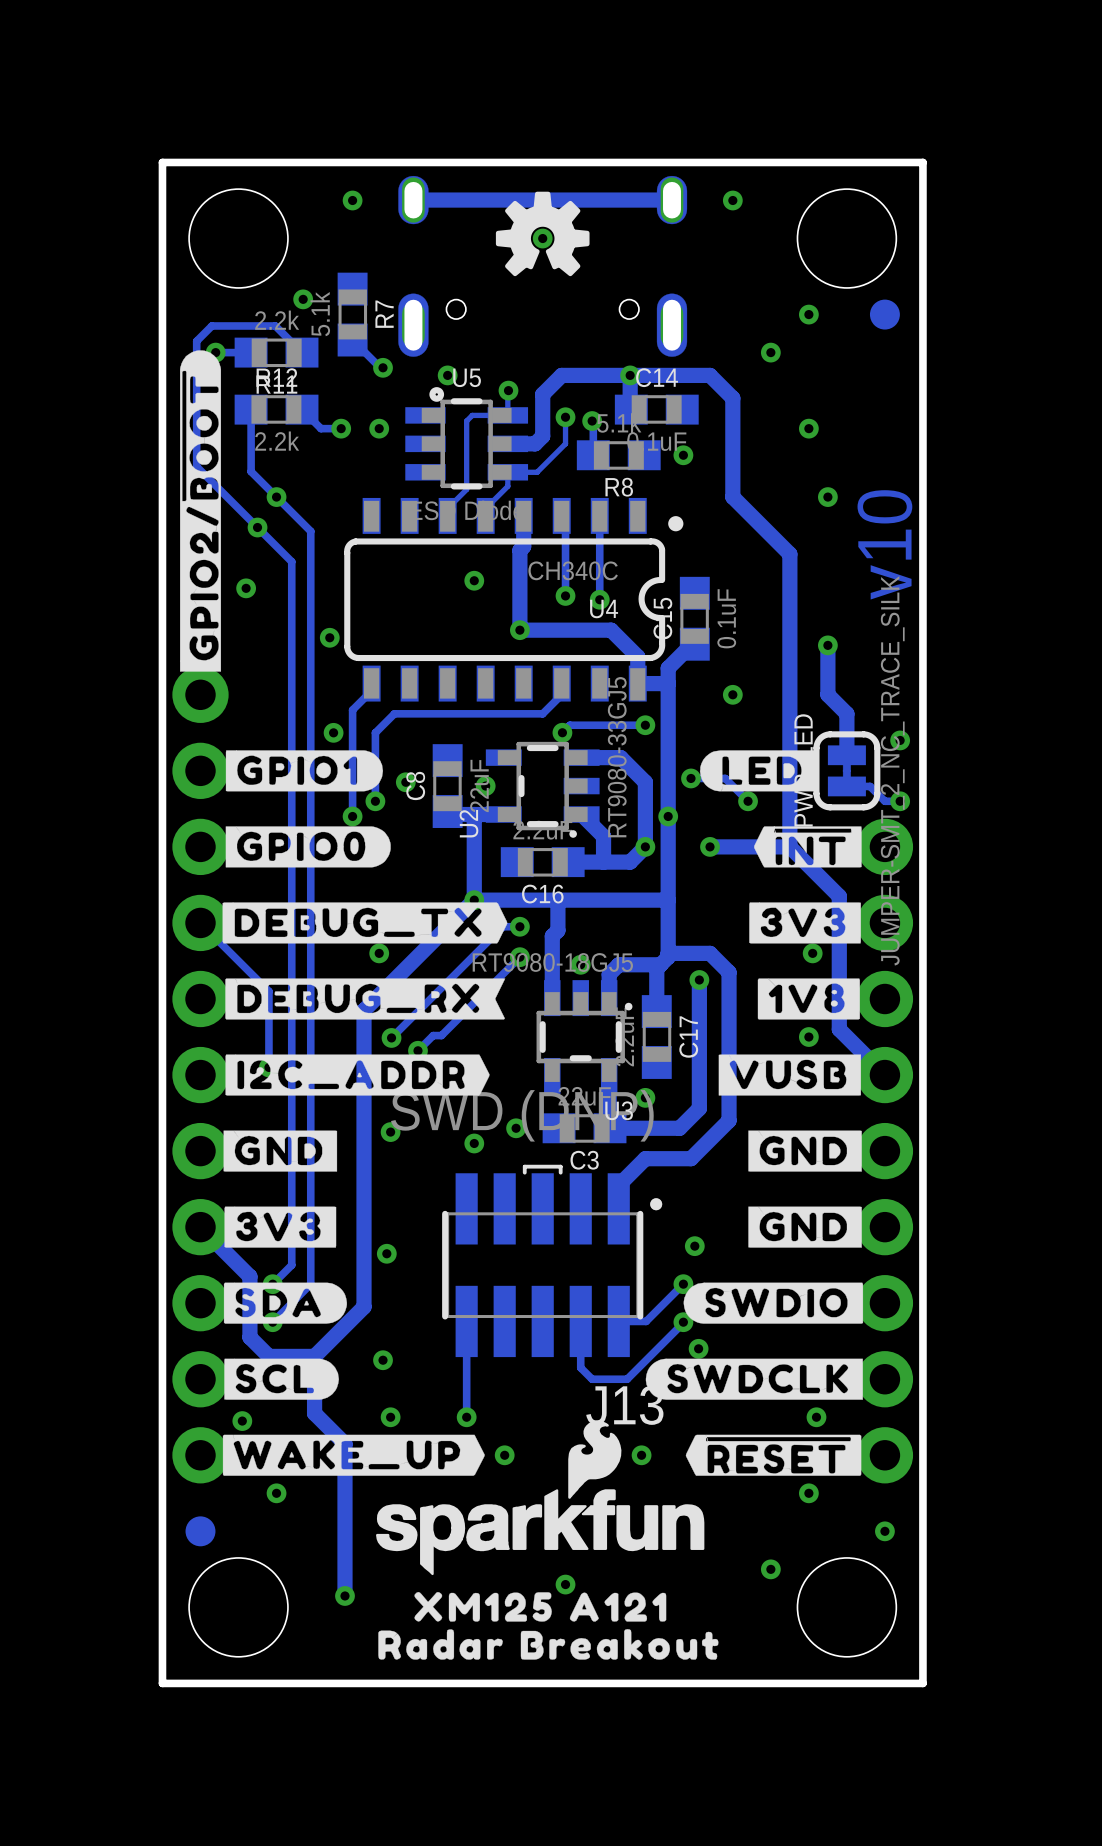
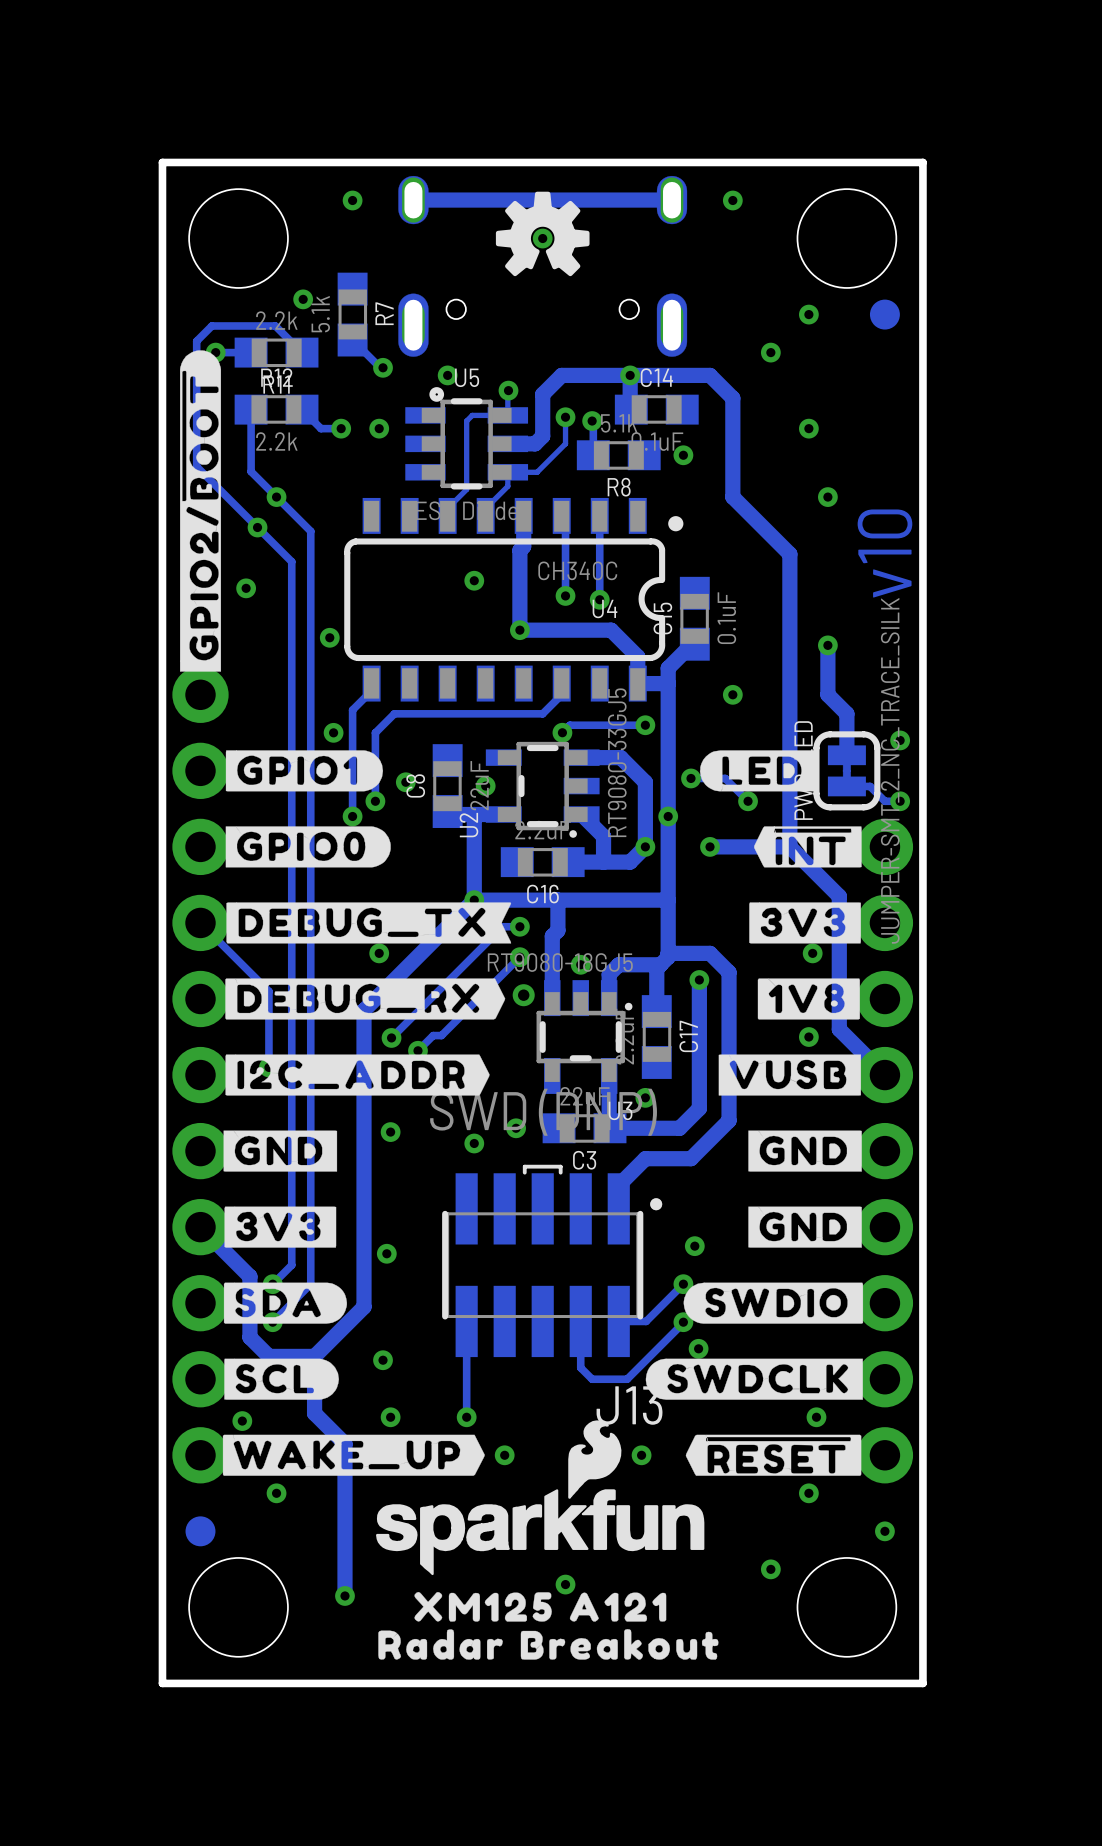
drawing shape: [222, 902, 508, 944] -> [226, 902, 512, 944]
drawing shape: [225, 978, 506, 1020] -> [225, 978, 506, 1020]
via: none -> (523, 995)

